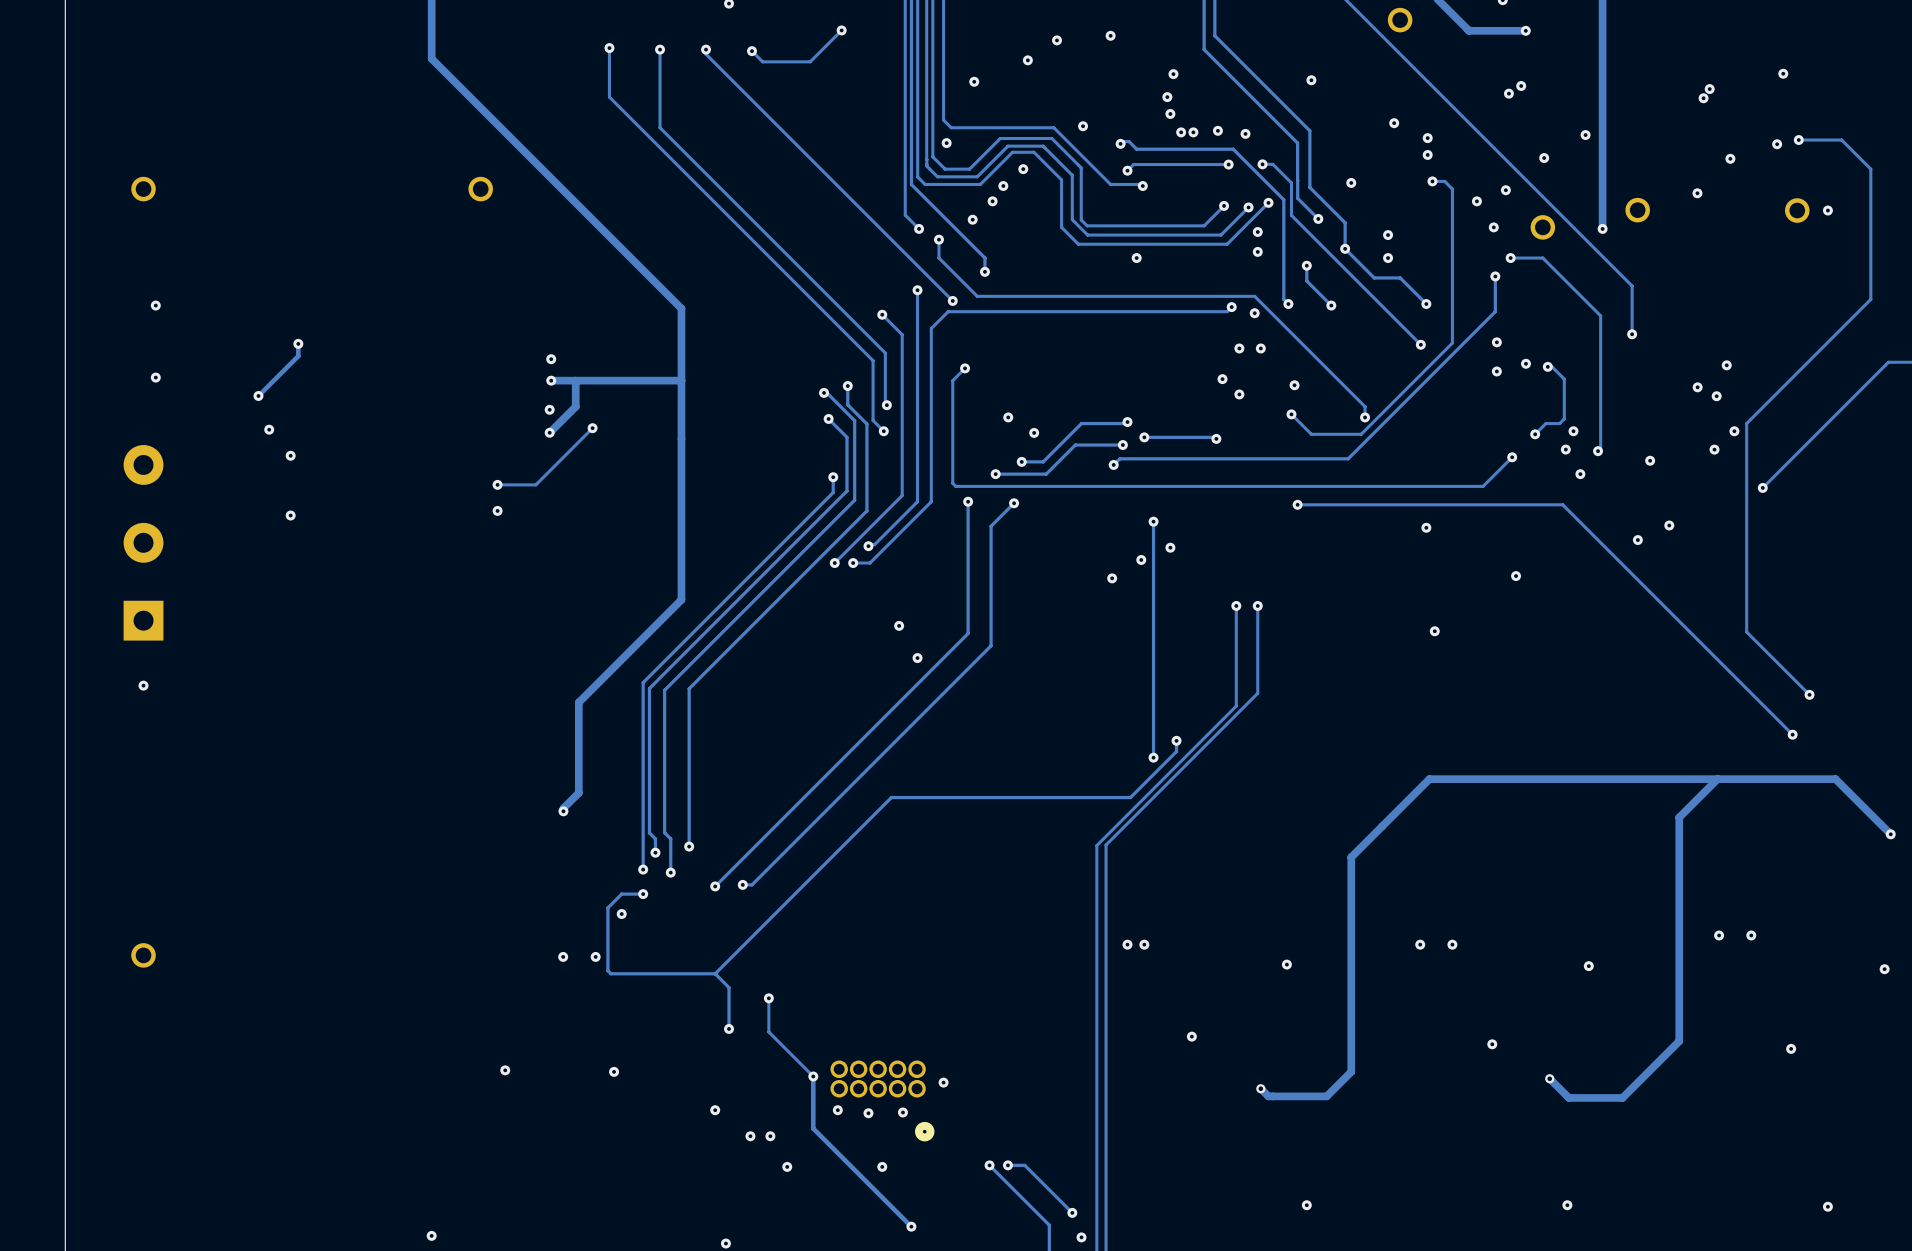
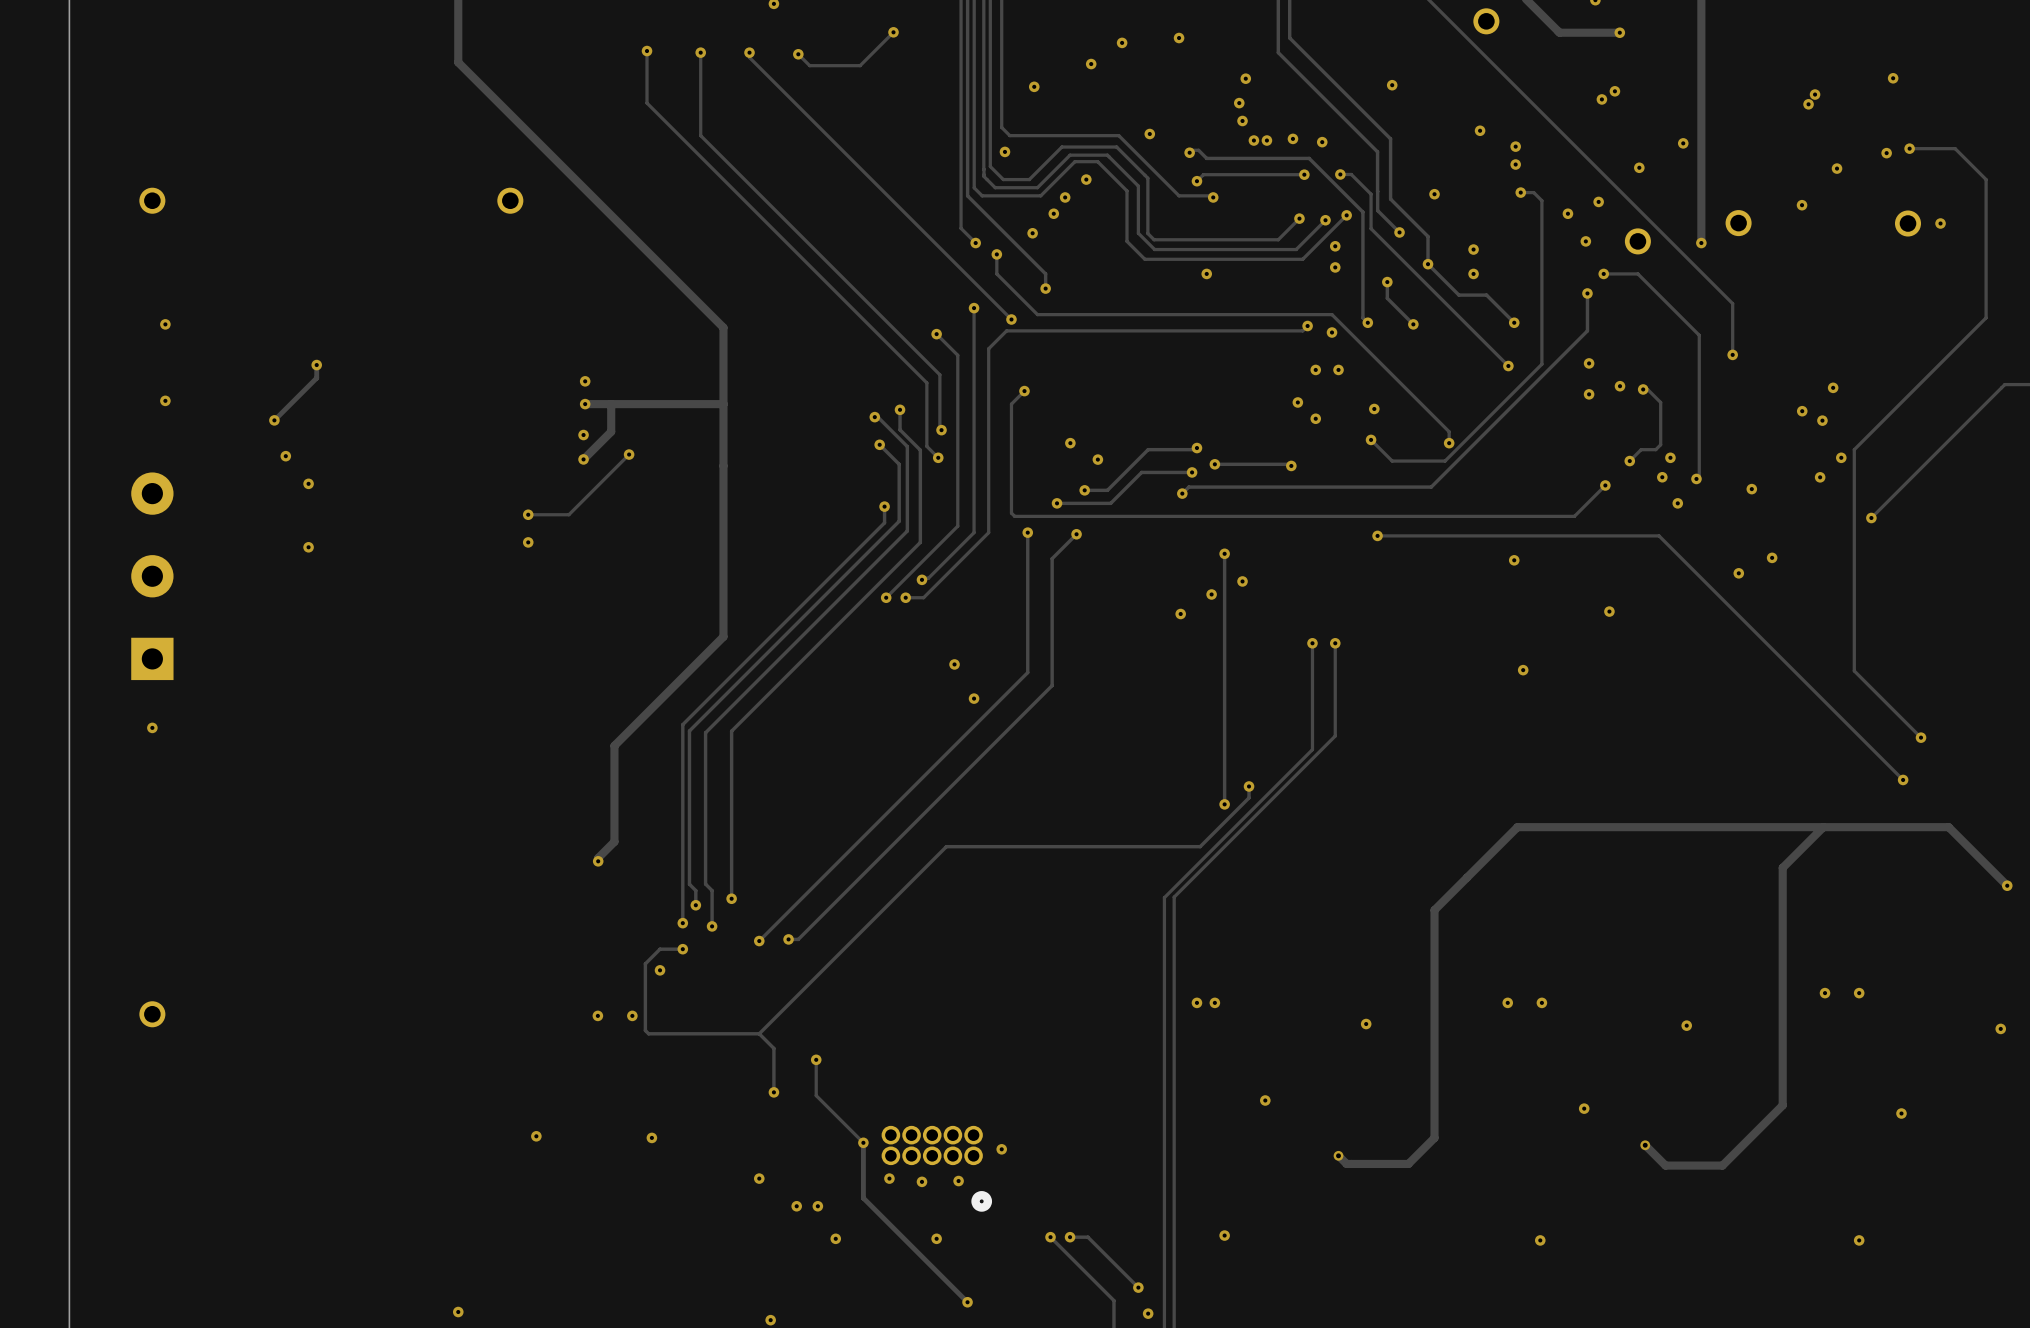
via: none -> (1224, 1235)
via: none -> (1540, 1240)
via: (1306, 1205) -> none
via: (1567, 1205) -> none
via position: (1827, 1206) -> (1859, 1240)

